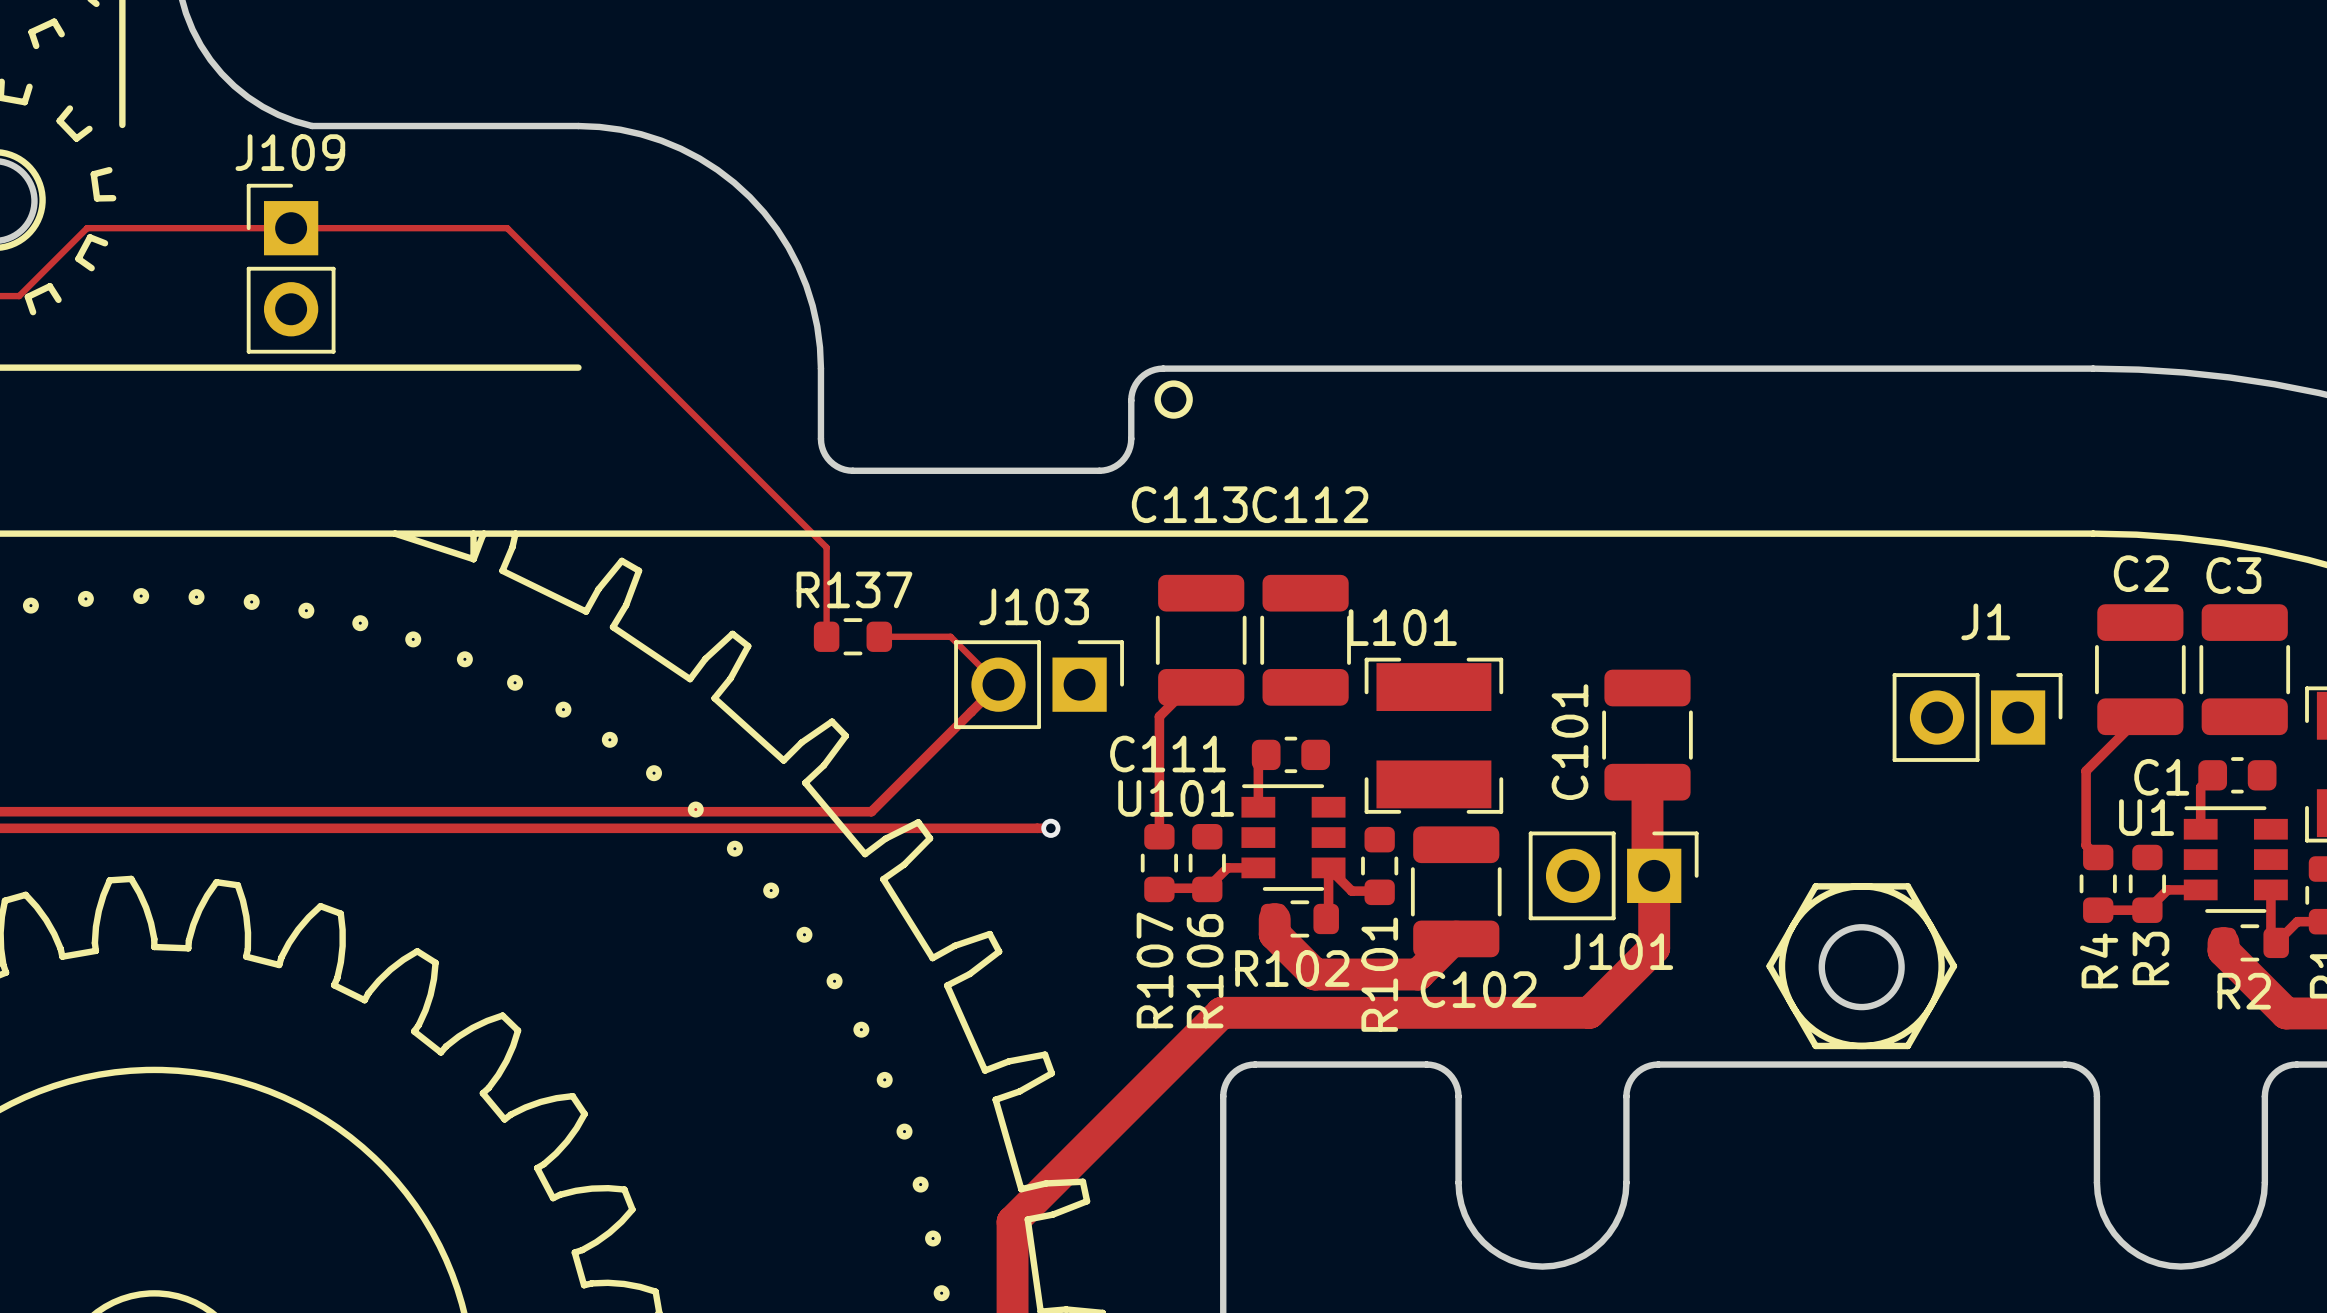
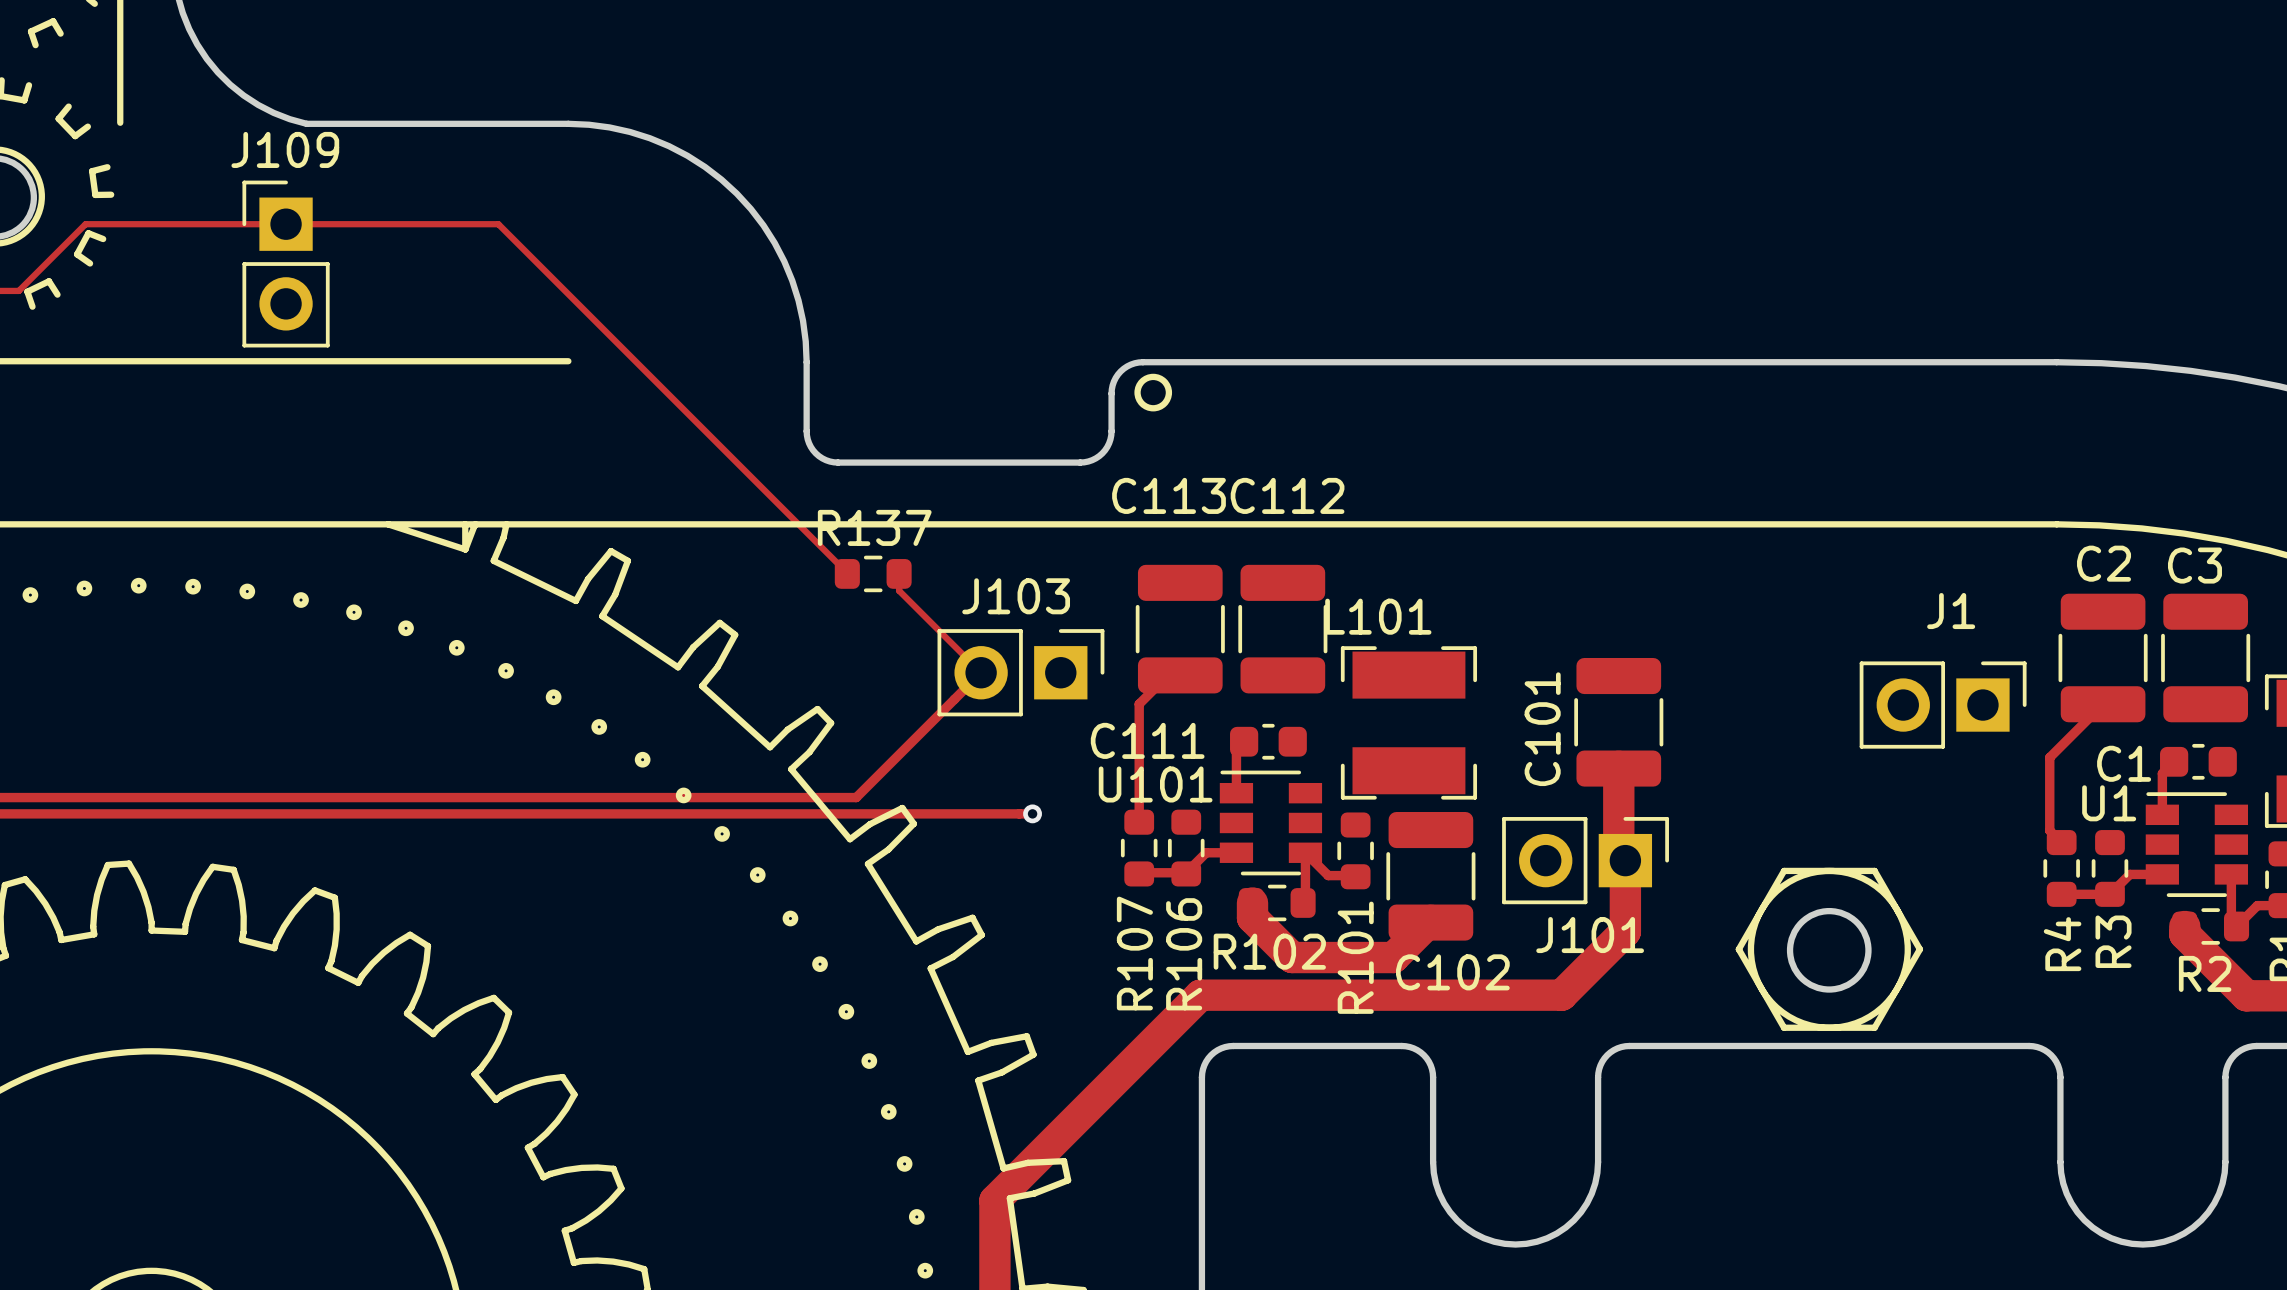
track: (826, 547) (826, 636) -> (812, 538) (847, 573)
R137 position: (852, 636) -> (873, 573)
track: (879, 636) (950, 636) -> (899, 573) (899, 590) (934, 625)

